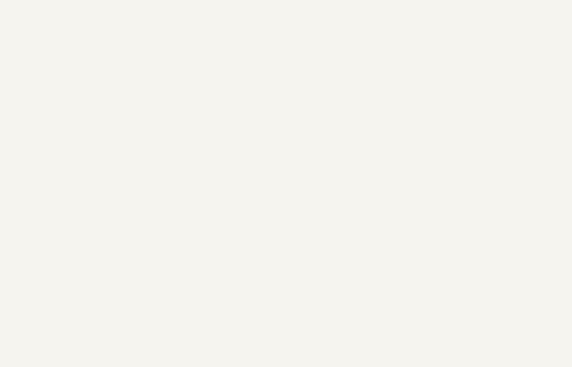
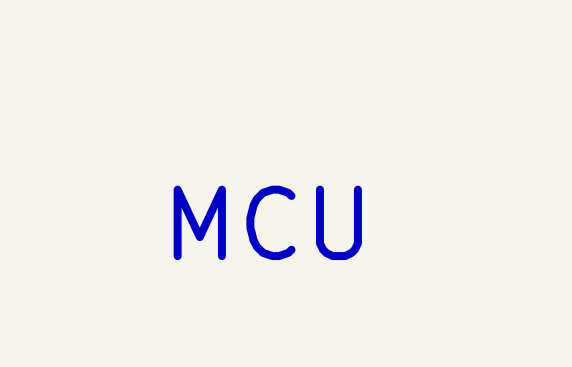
text: none -> MCU (267, 222)

